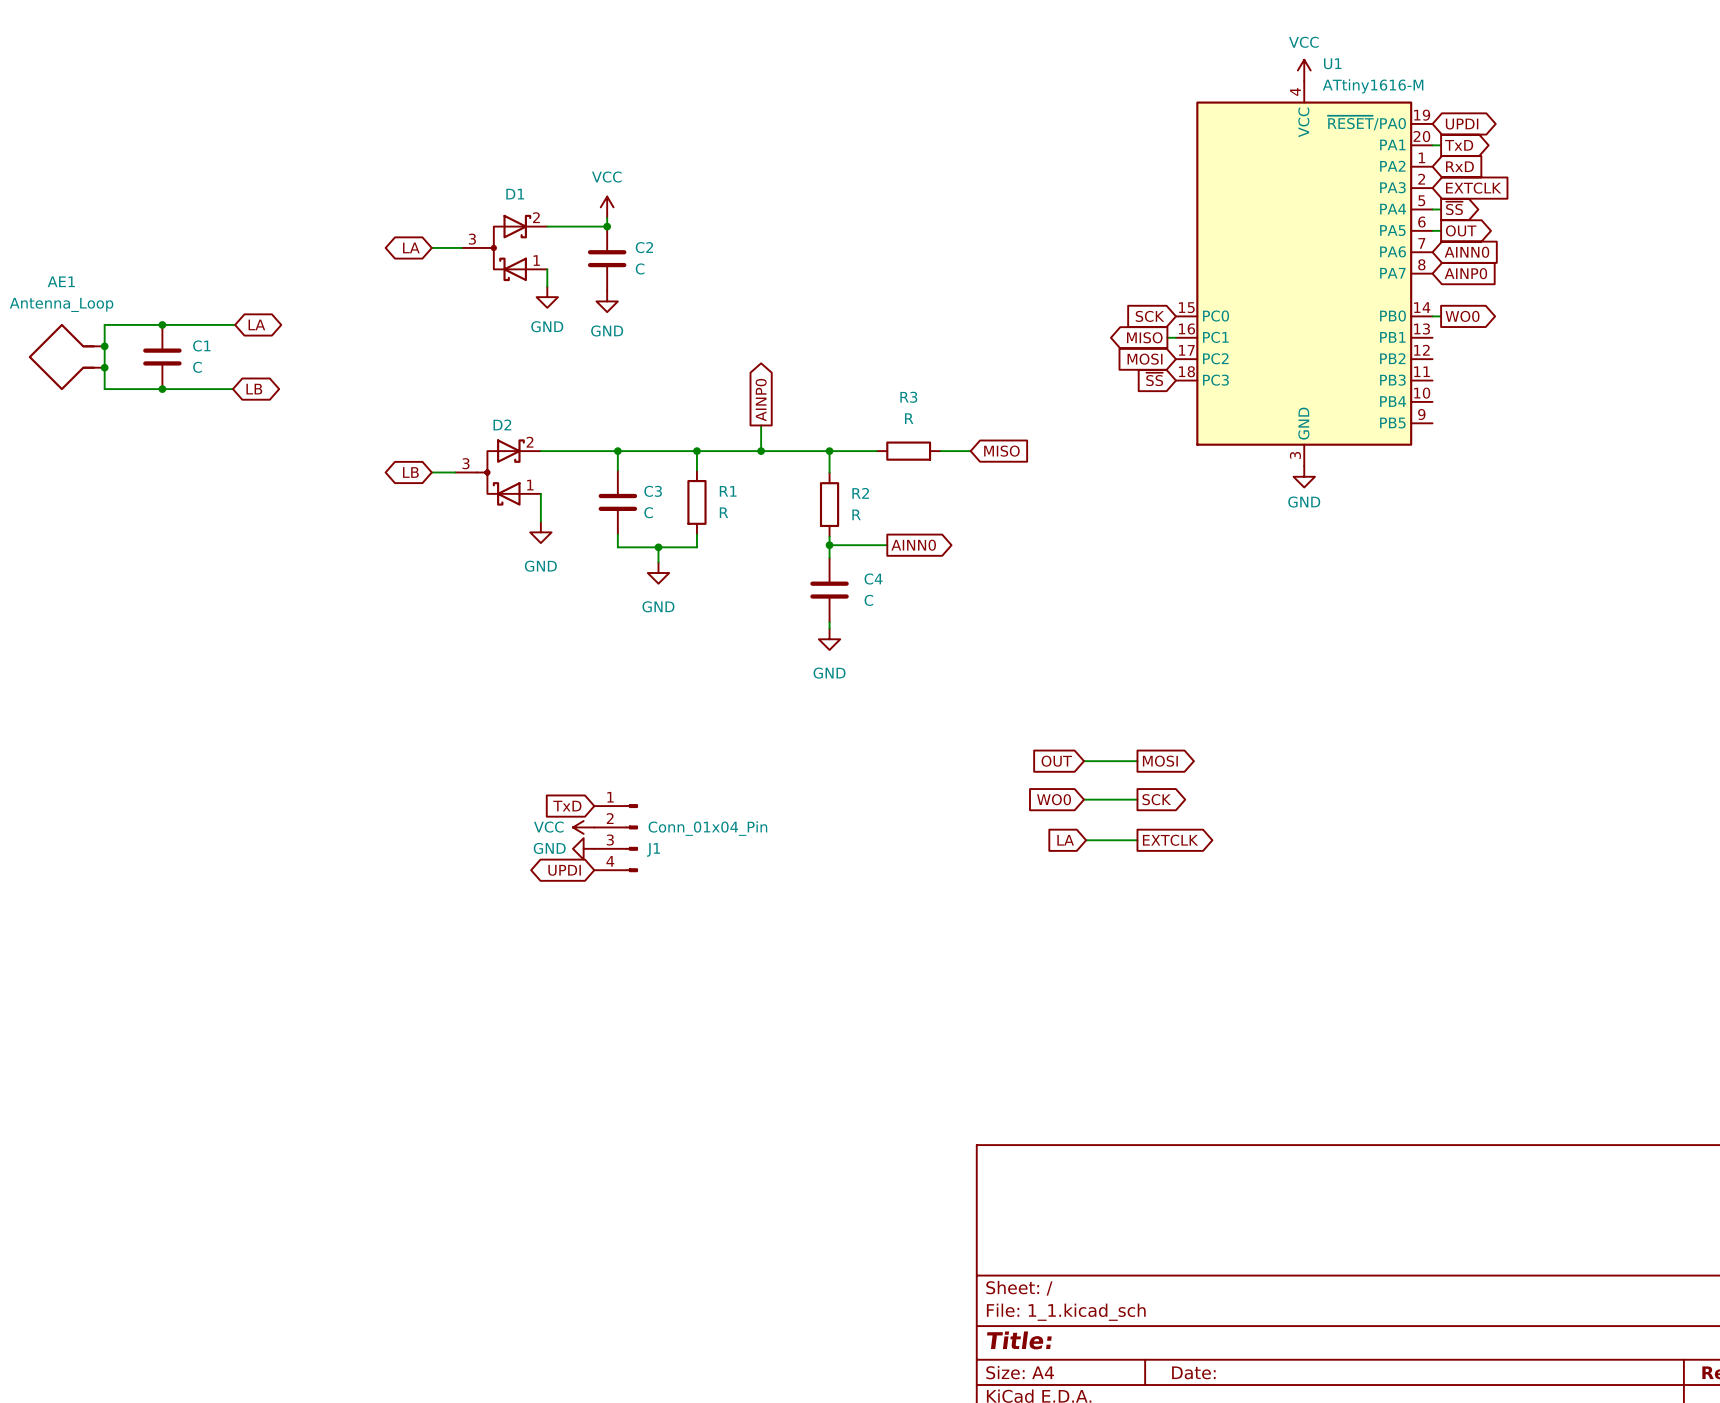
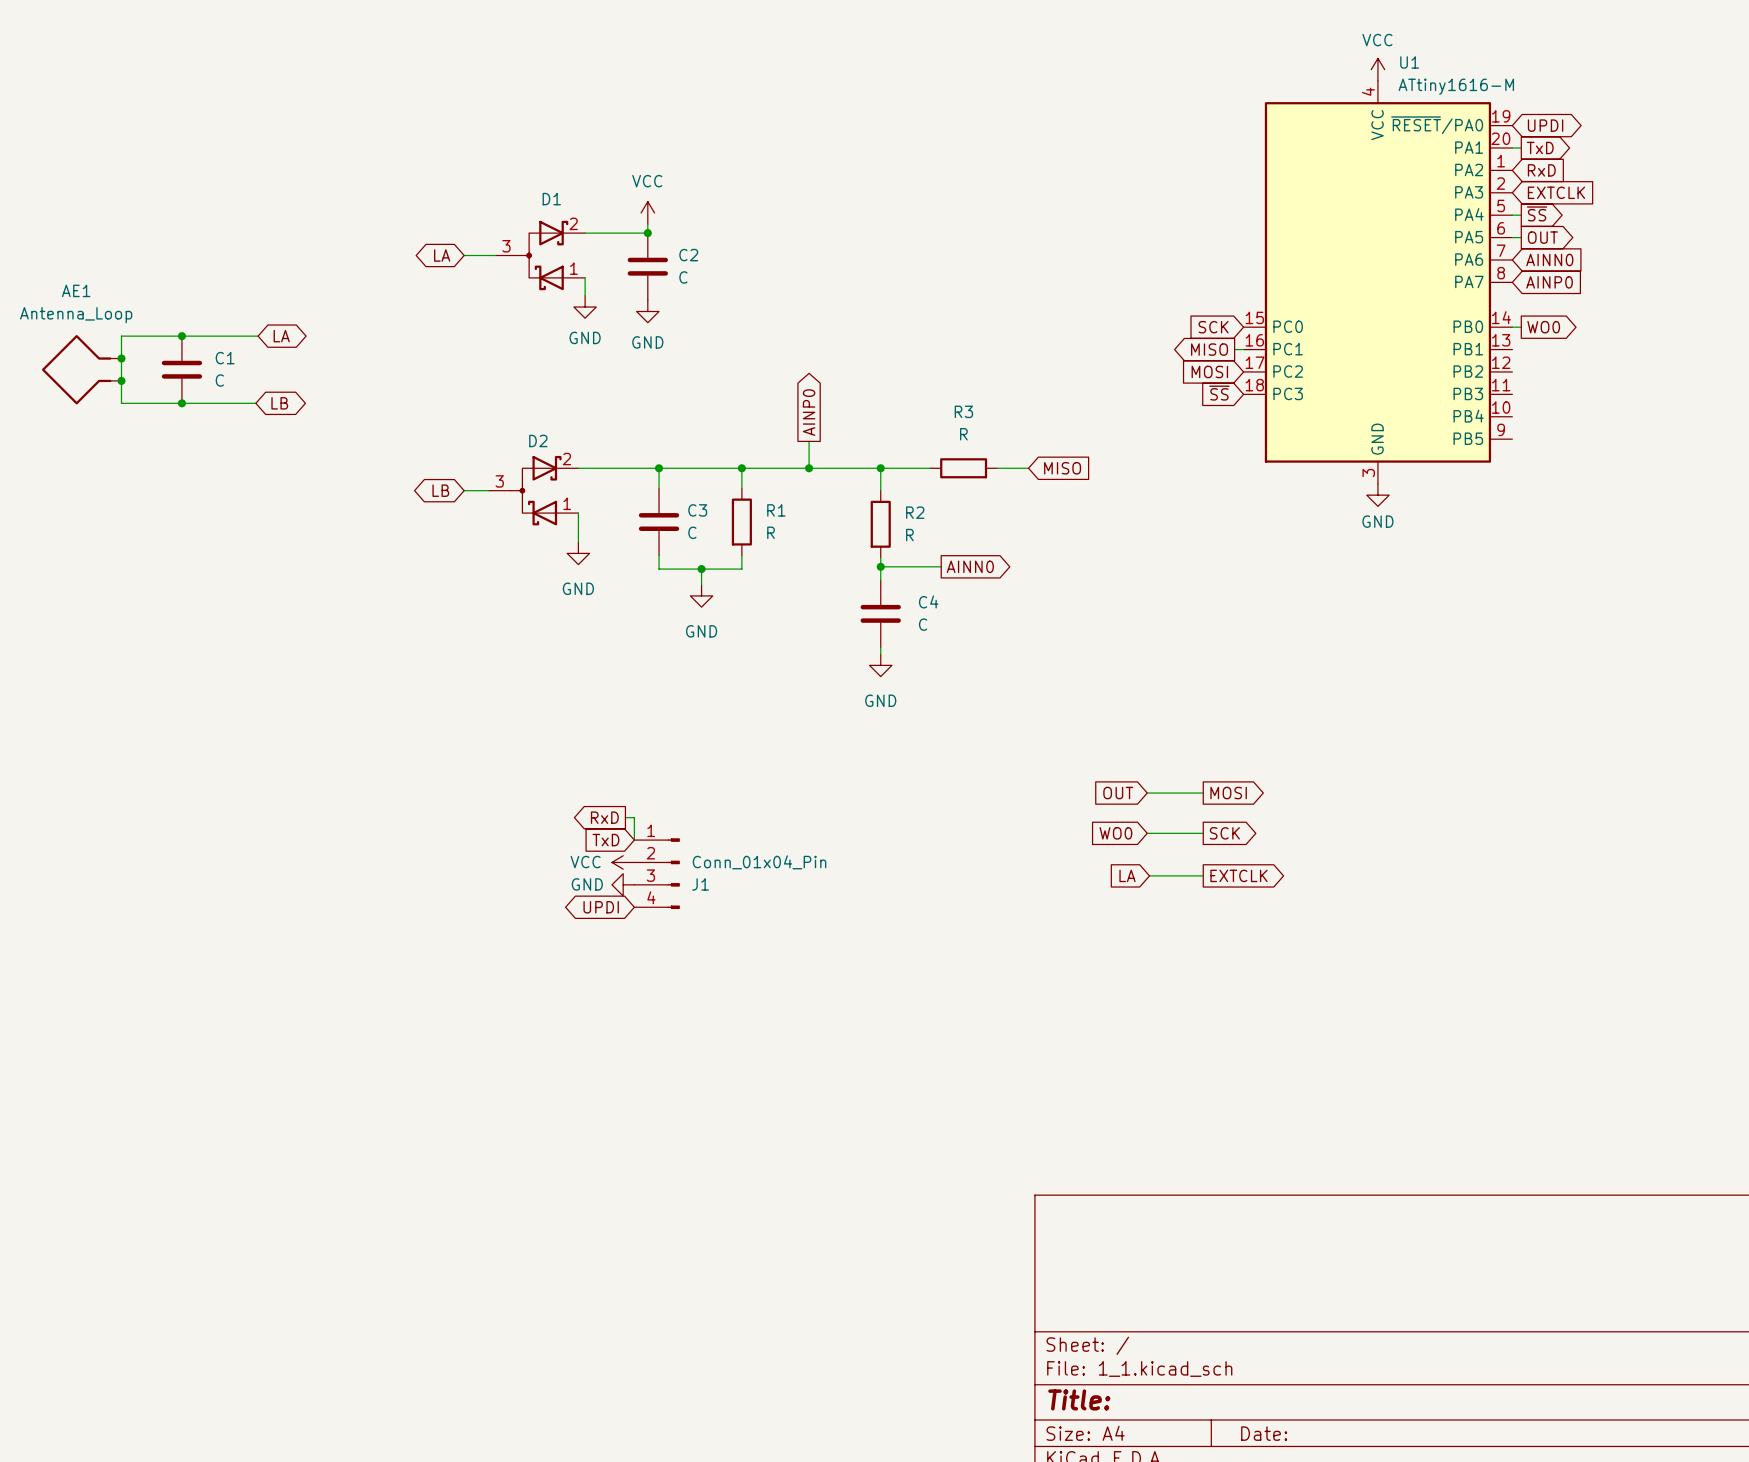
global label: none -> RxD (604, 817)
wire: none -> (625, 817) (634, 817) (634, 840)

